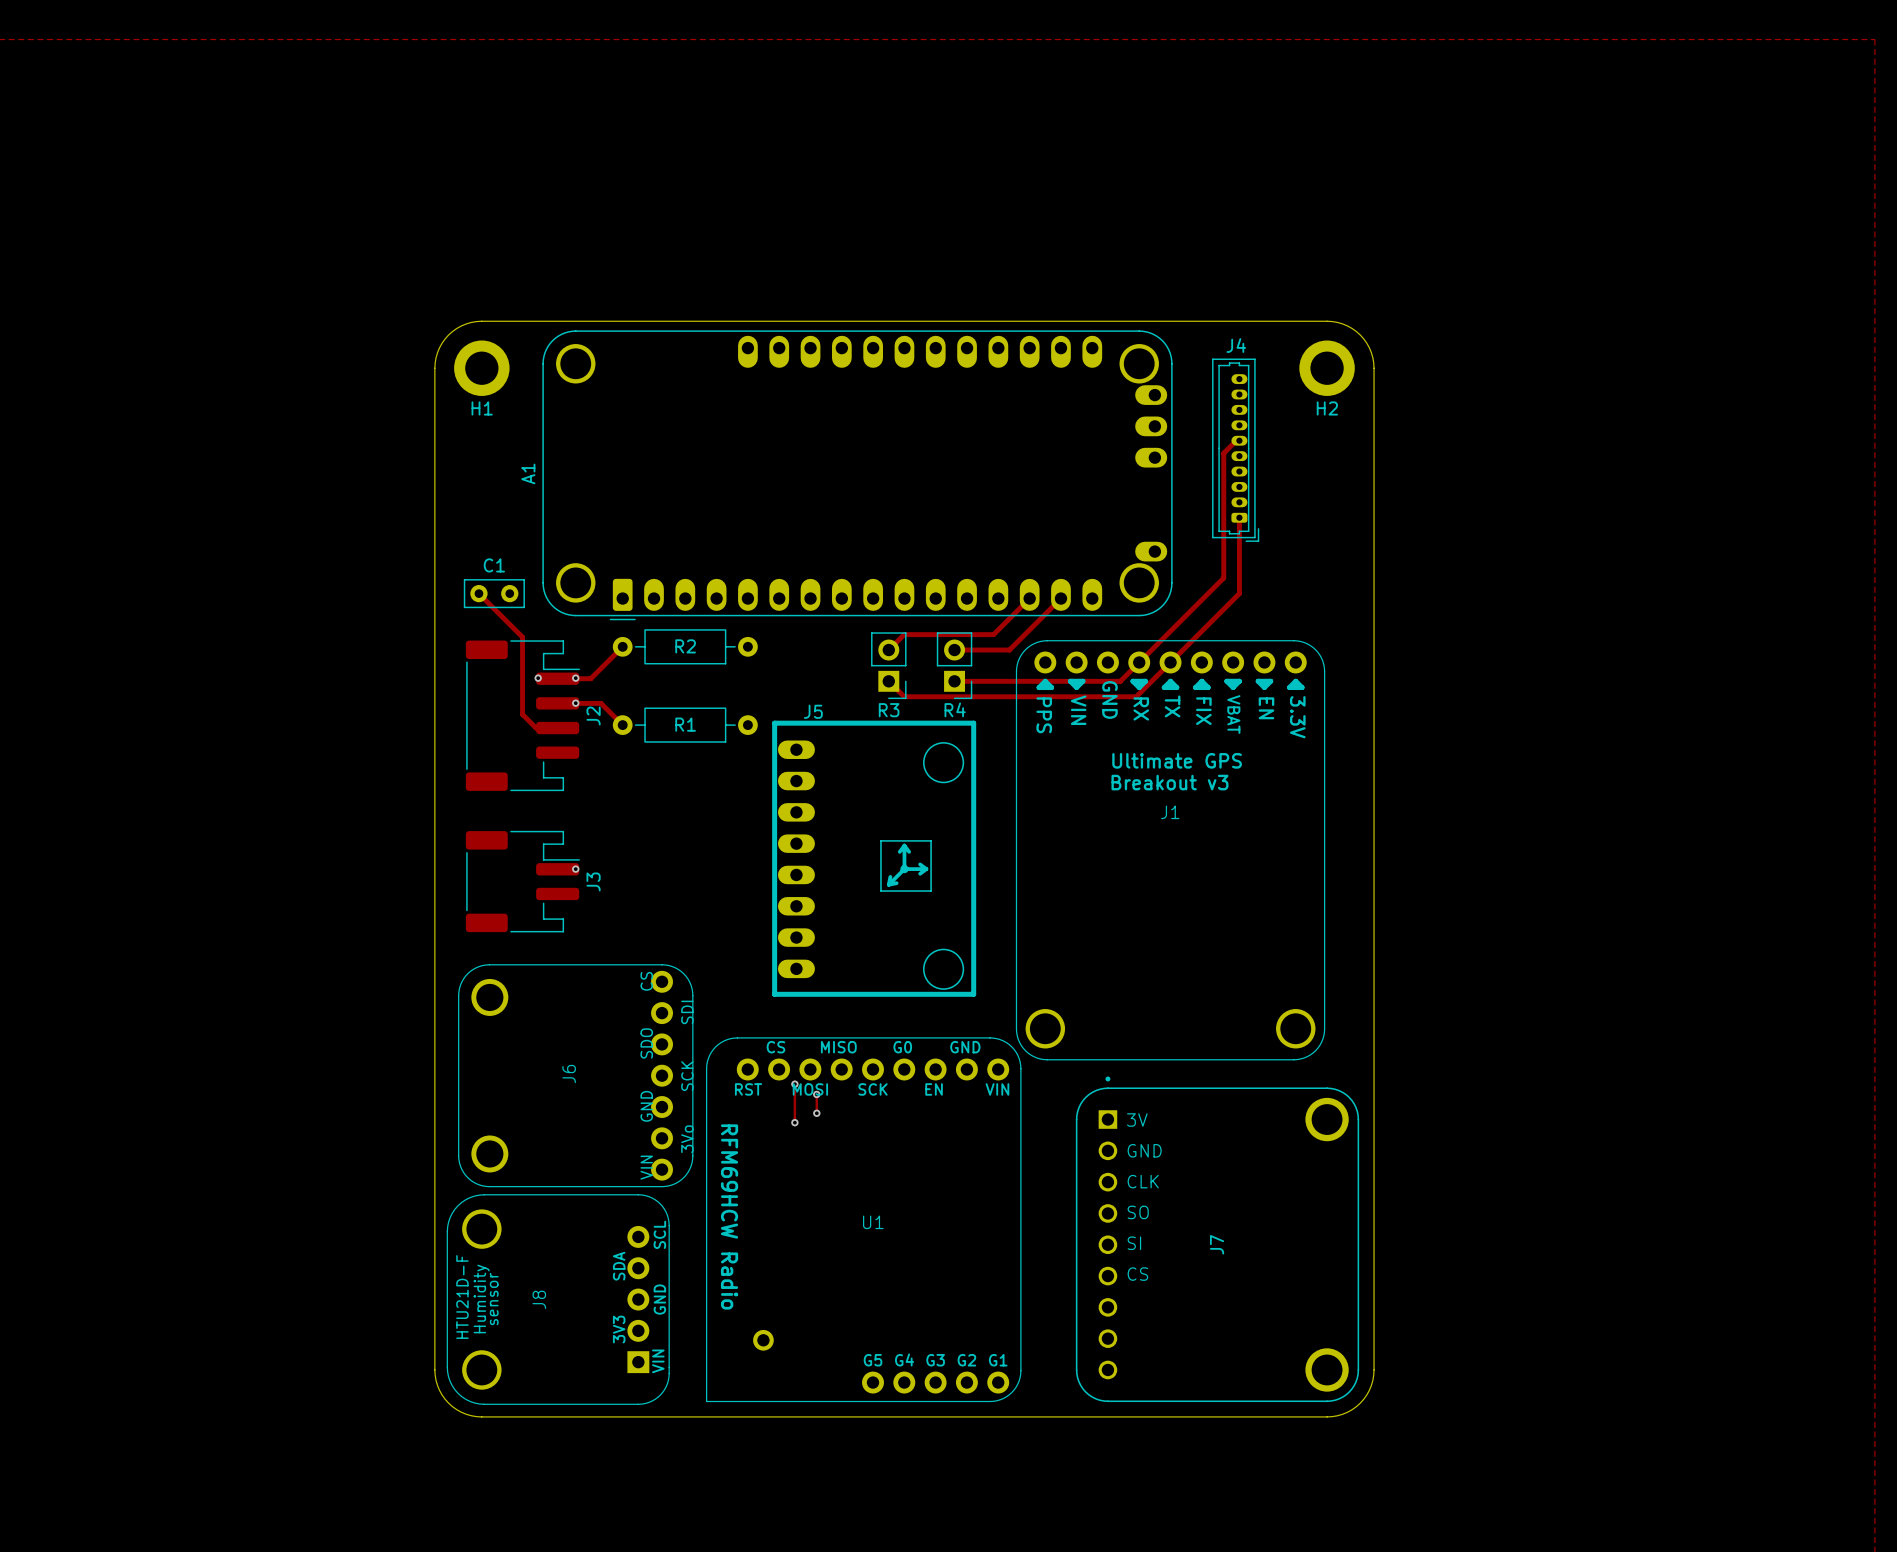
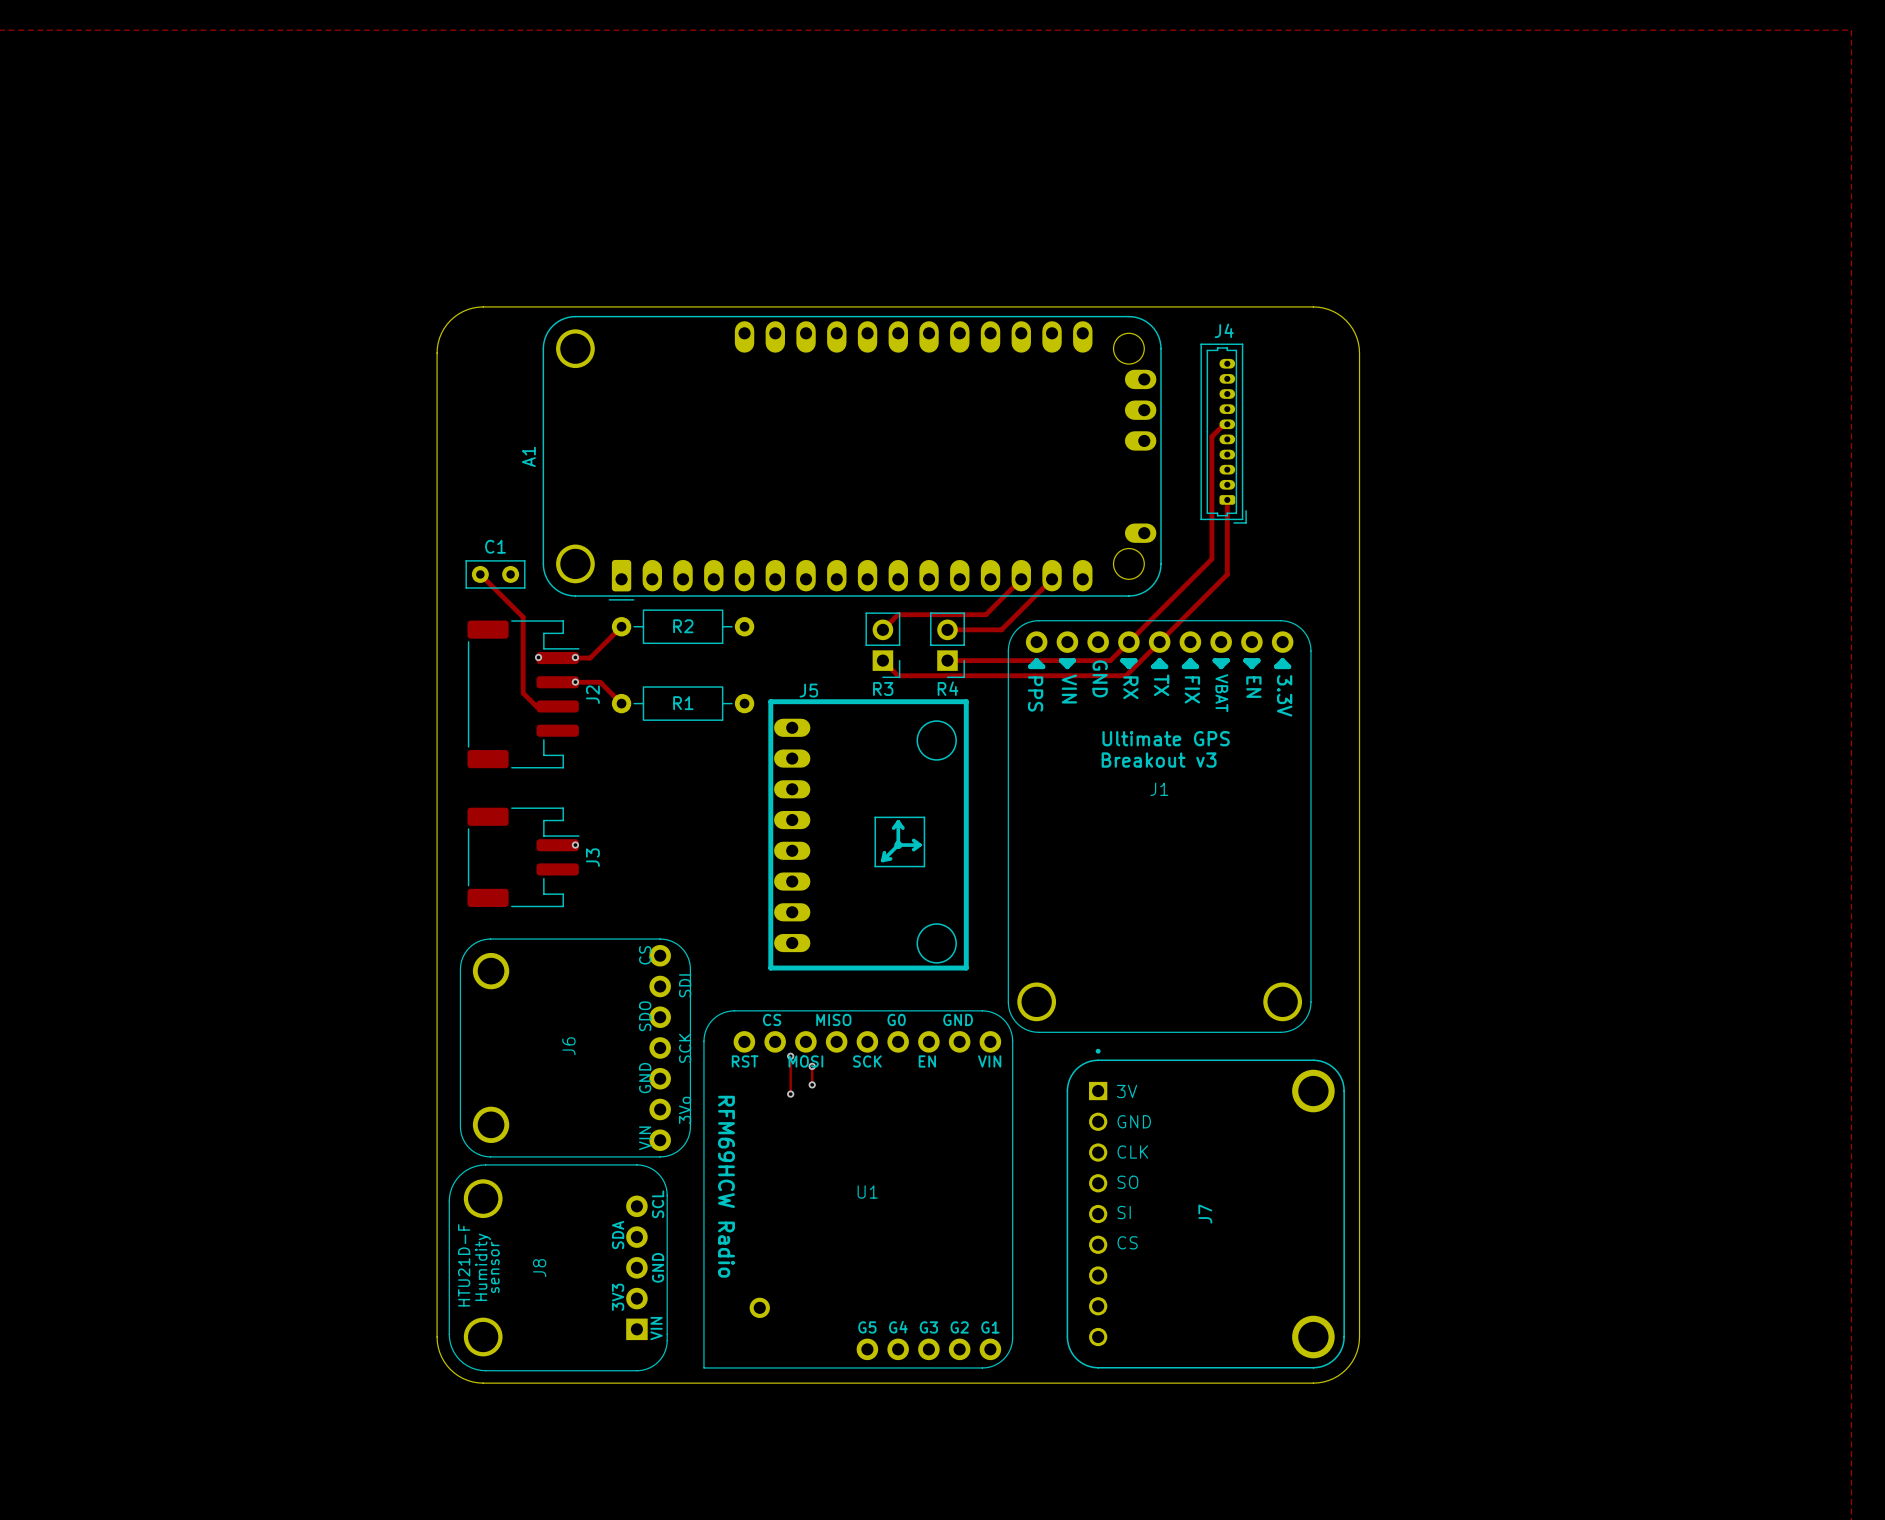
A1 footprint: [542, 330, 1173, 621] -> [542, 315, 1162, 601]
H1: (481, 368) -> none
H2: (1327, 368) -> none

